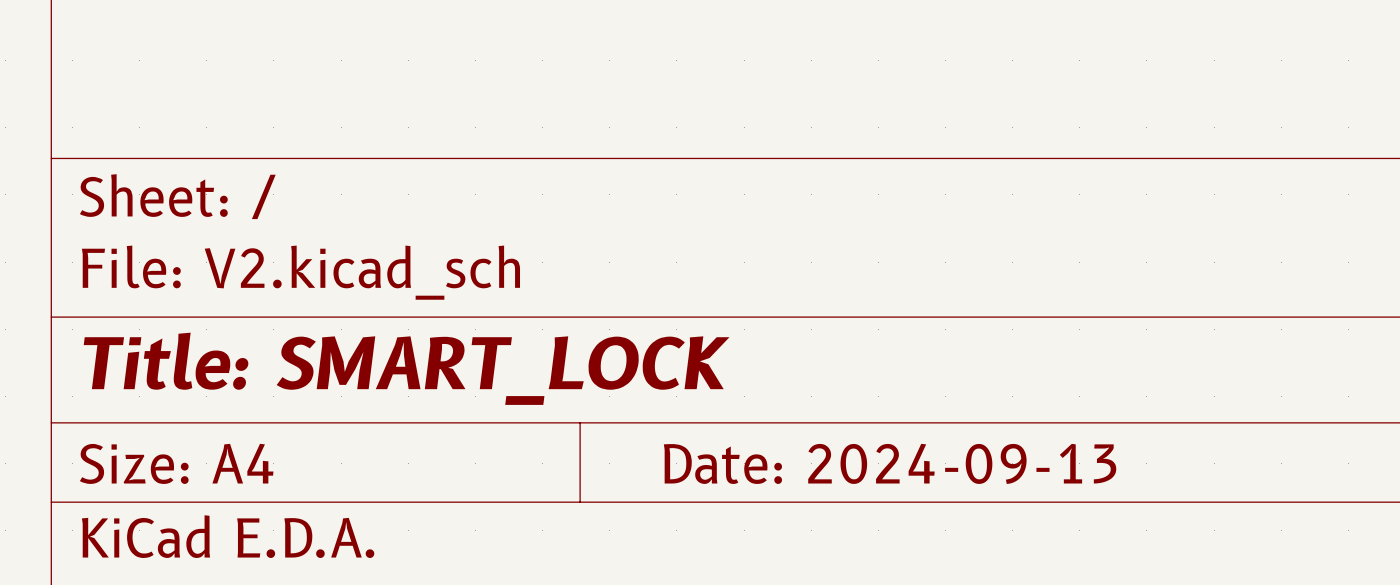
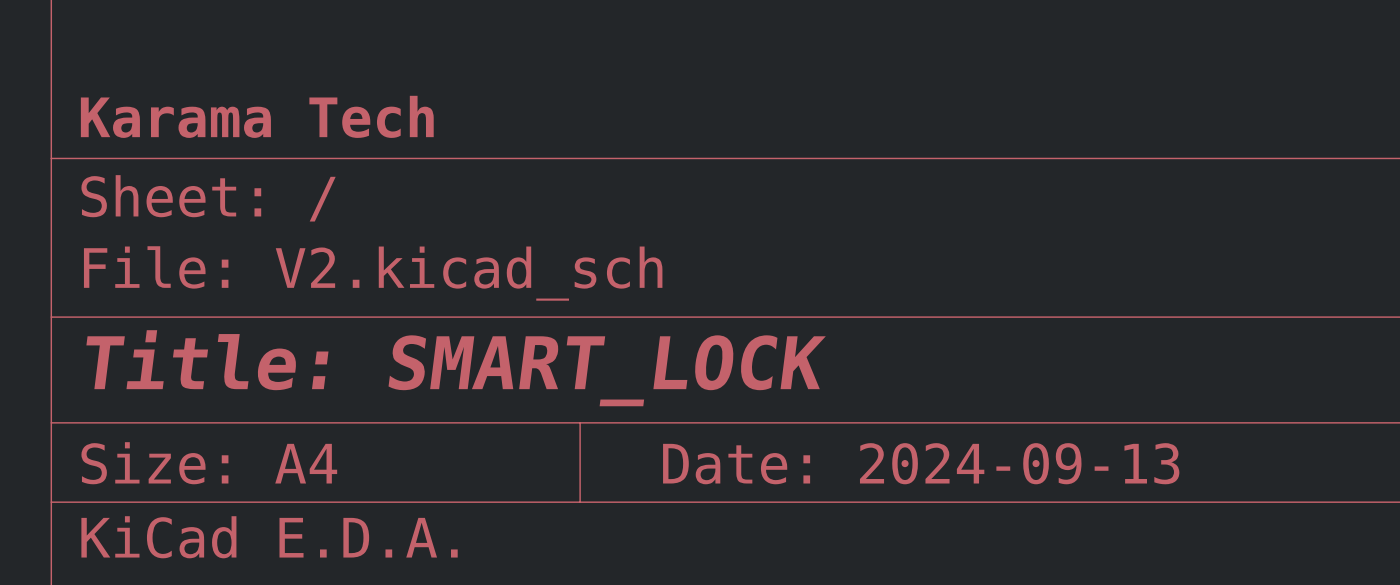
title block: none -> Karama Tech (257, 116)

